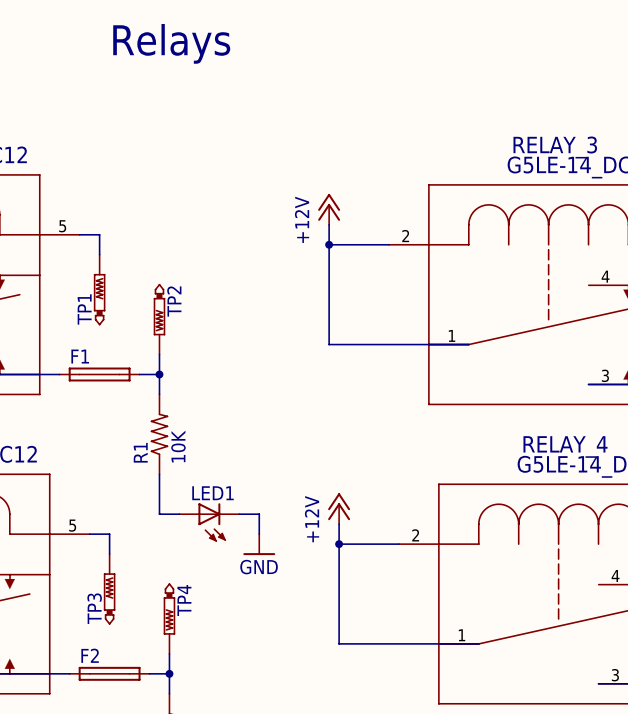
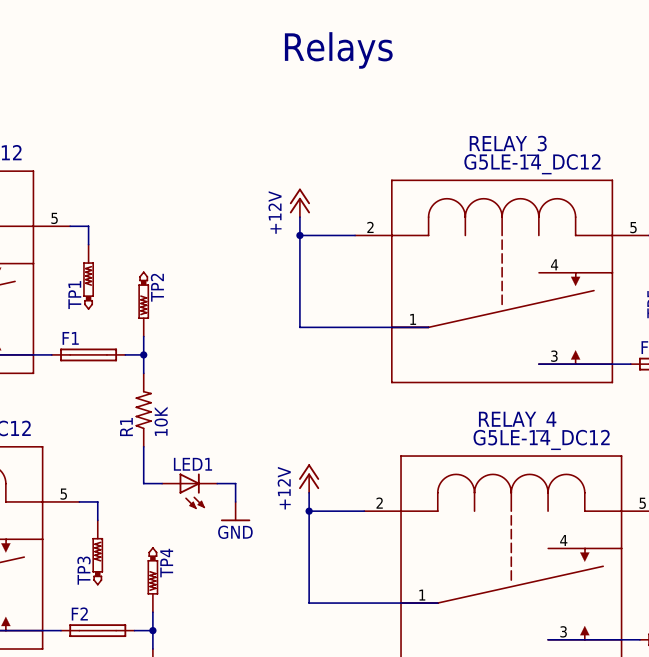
text: Relays (171, 43) -> none
text: none -> Relays (338, 50)

